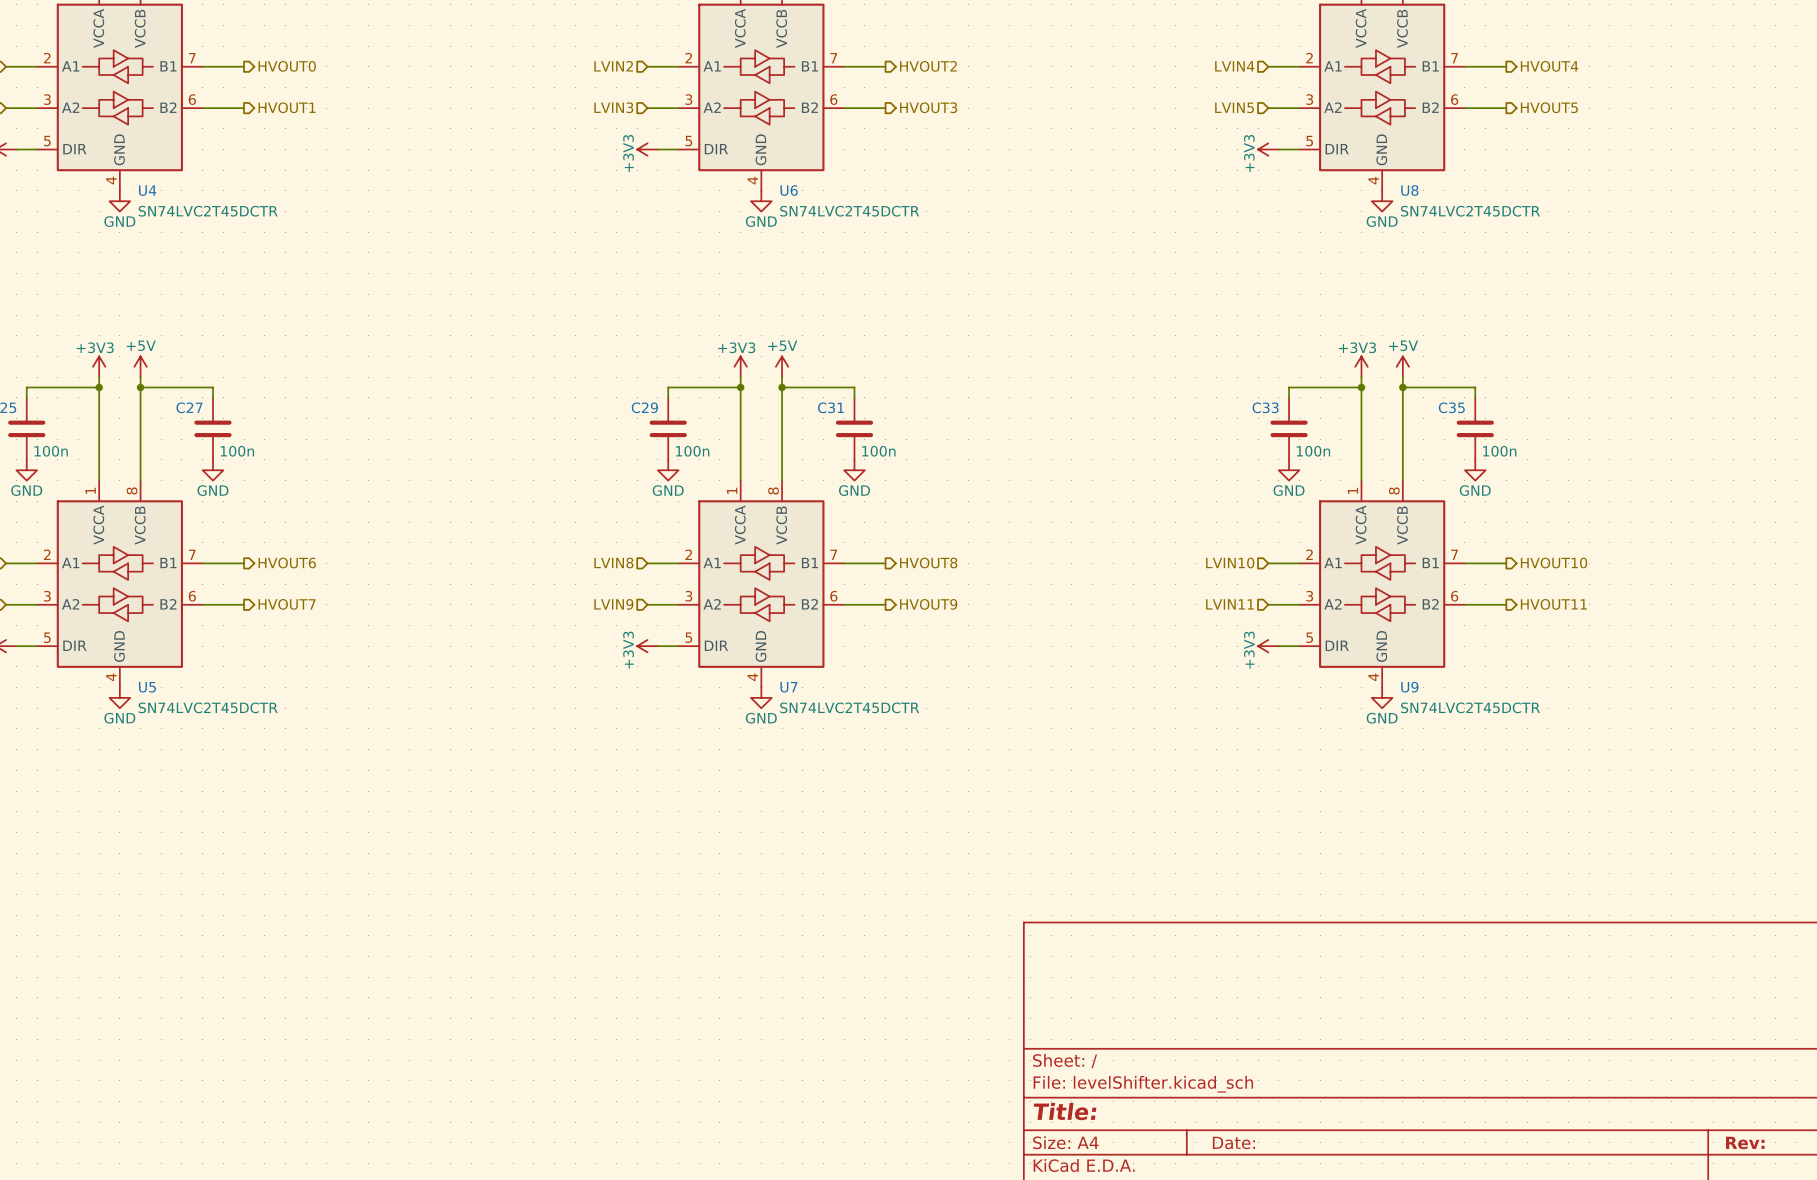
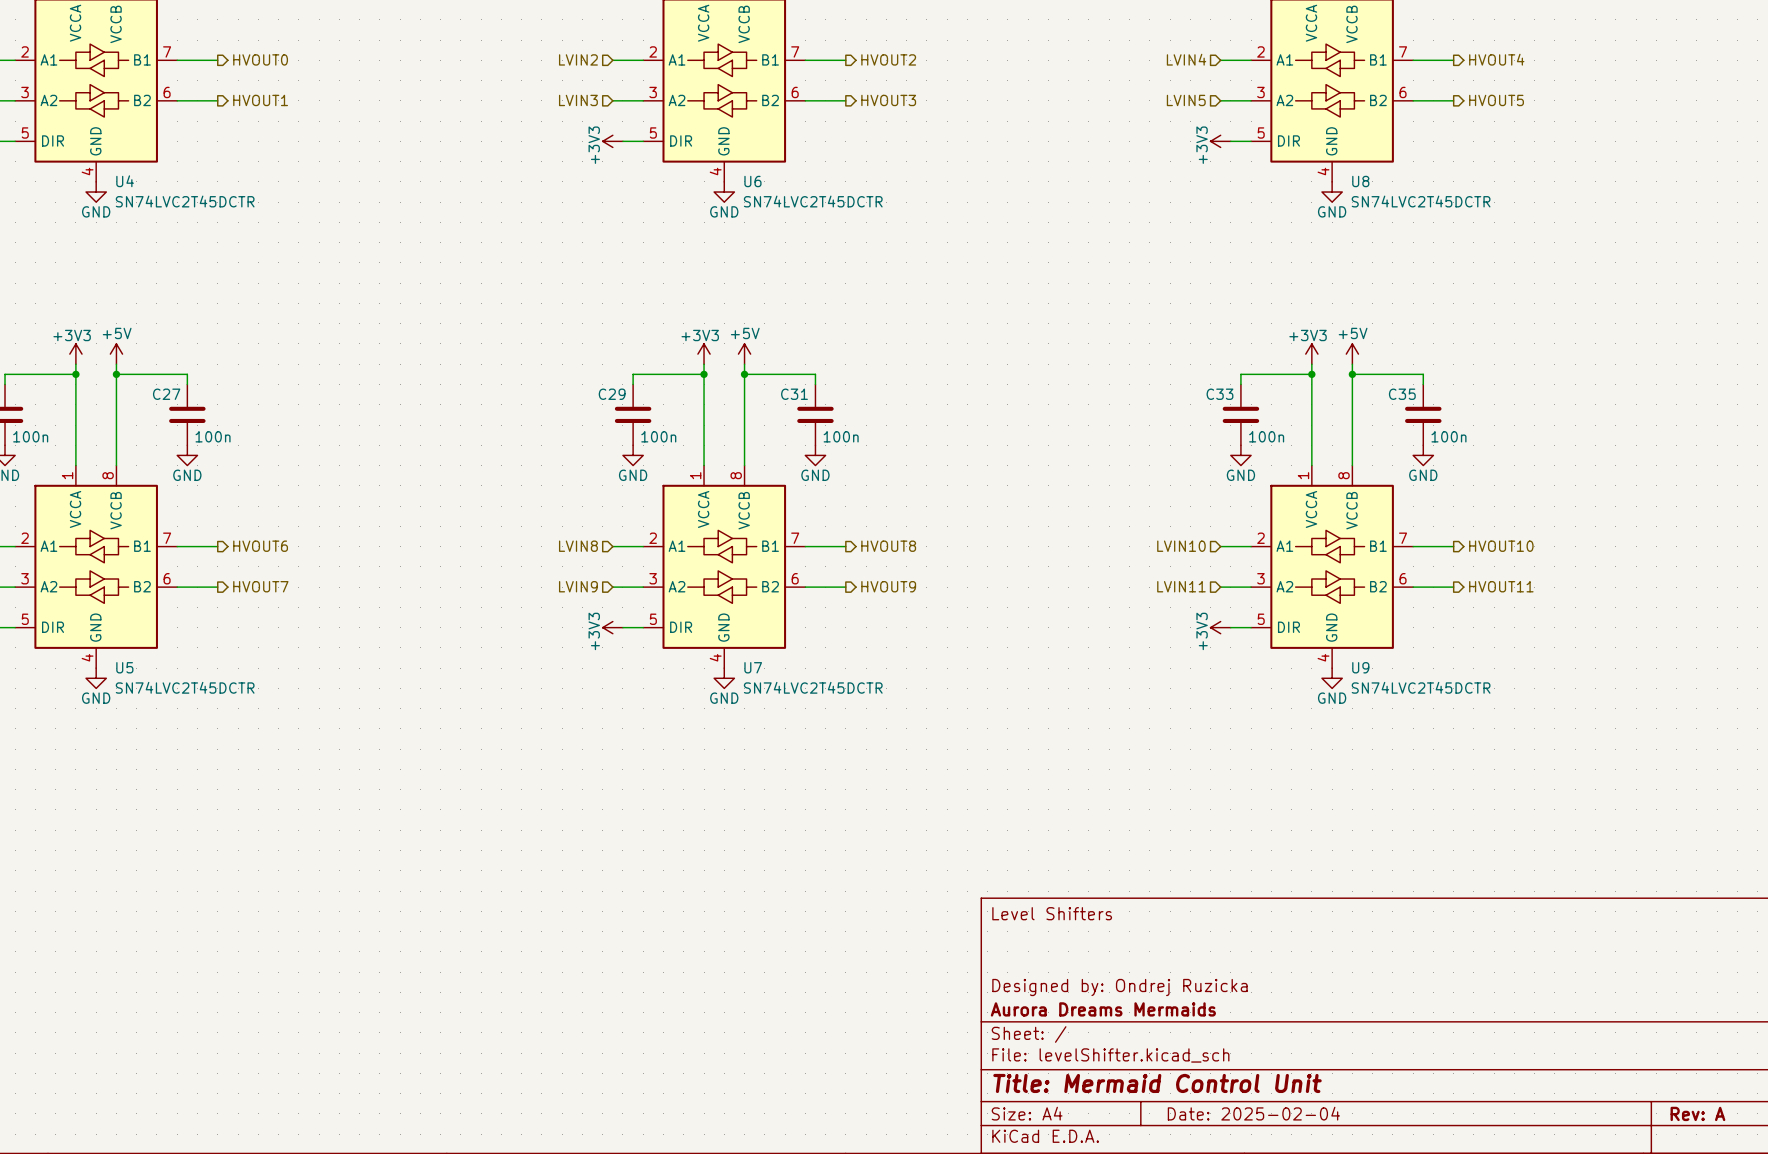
title block: none -> Level Shifters (1052, 913)
title block: none -> Designed by: Ondrej Ruzicka (1119, 987)
title block: none -> Aurora Dreams Mermaids (1103, 1009)
title block: Title: (1065, 1111) -> Title: Mermaid Control Unit (1157, 1083)
title block: Date: (1233, 1142) -> Date: 2025-02-04 (1253, 1113)
title block: Rev: (1745, 1142) -> Rev: A (1697, 1113)

